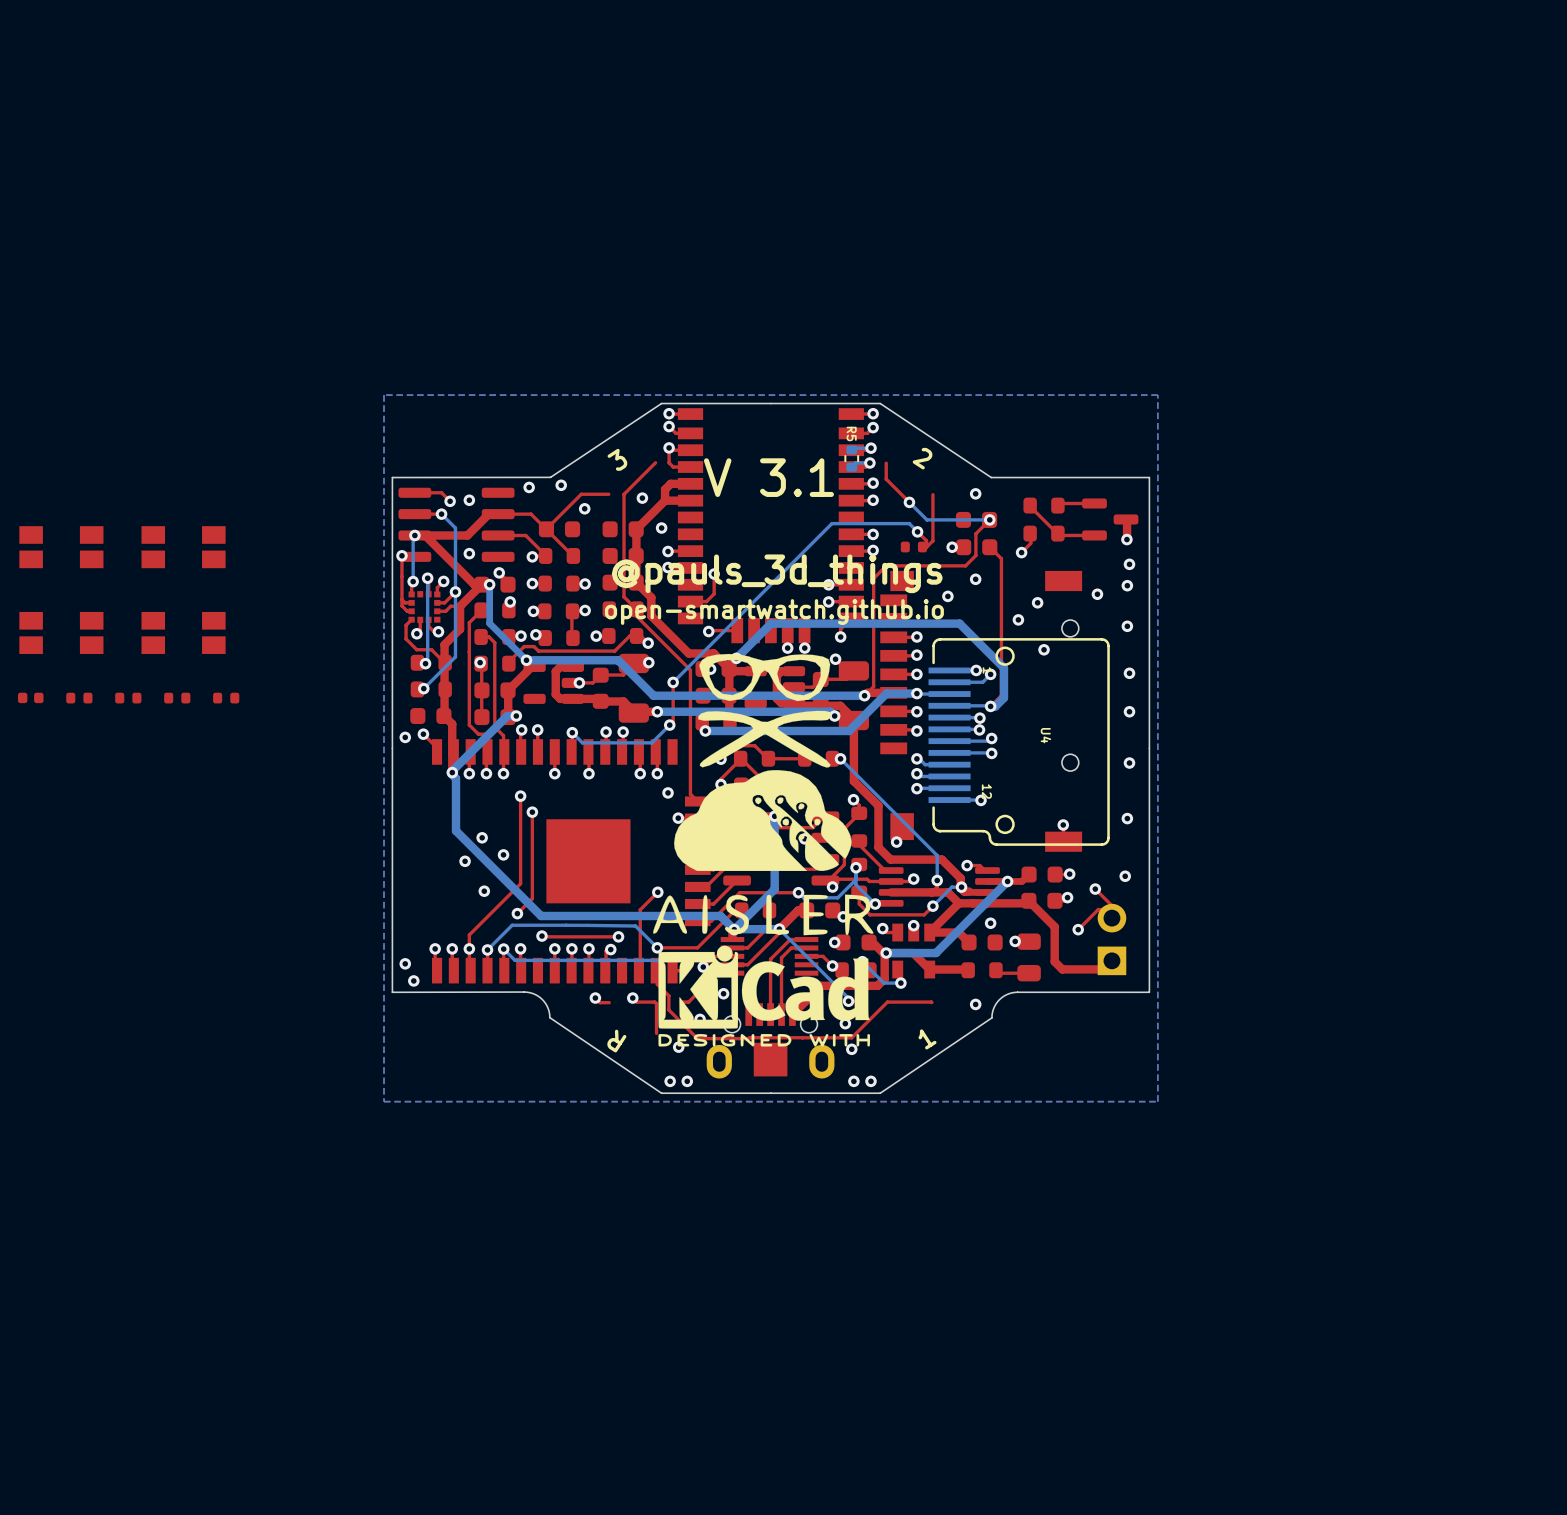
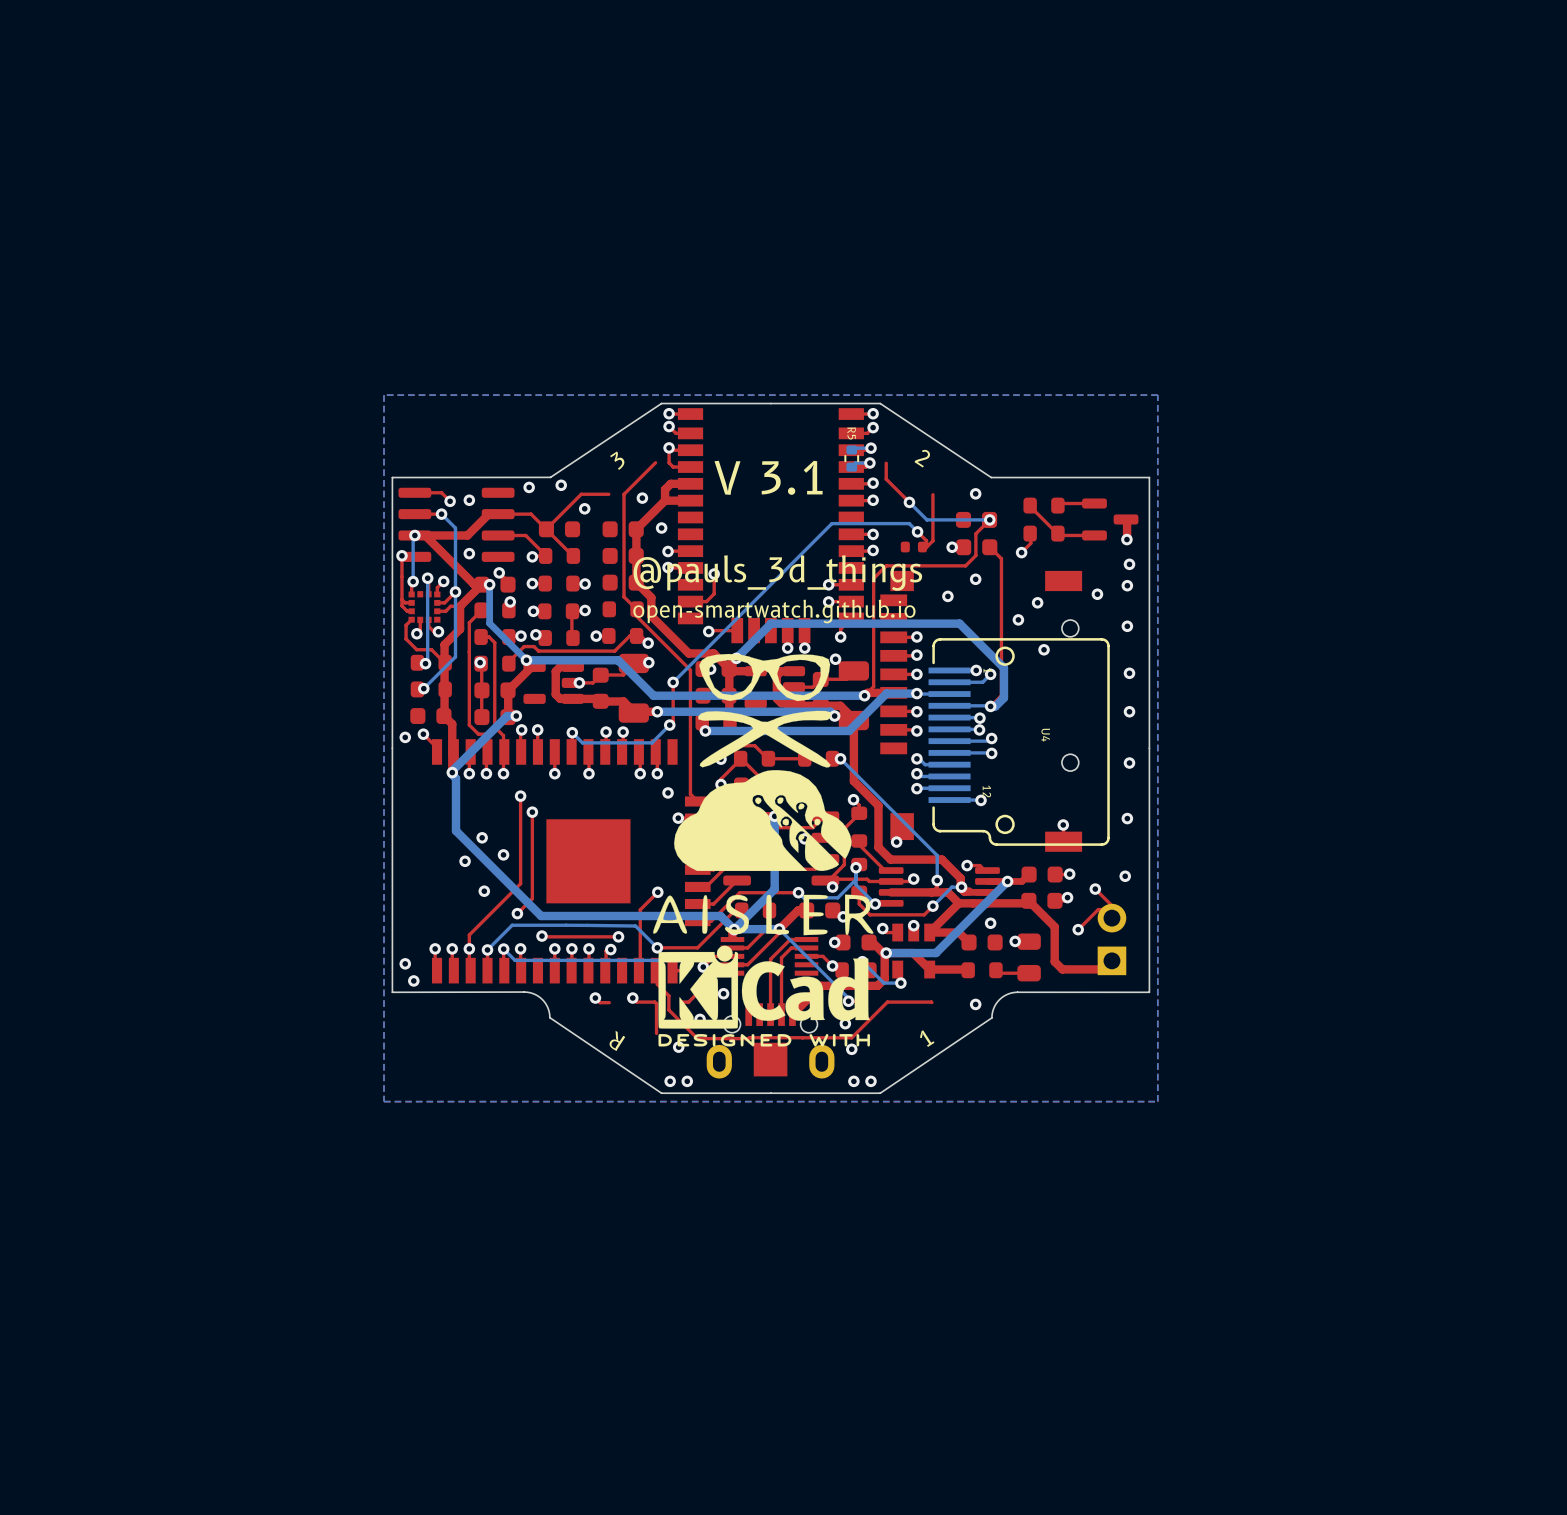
part: (61, 547) -> none
part: (183, 547) -> none
part: (61, 632) -> none
part: (183, 632) -> none
part: (30, 697) -> none
part: (79, 698) -> none
part: (128, 698) -> none
part: (177, 698) -> none
part: (226, 698) -> none

